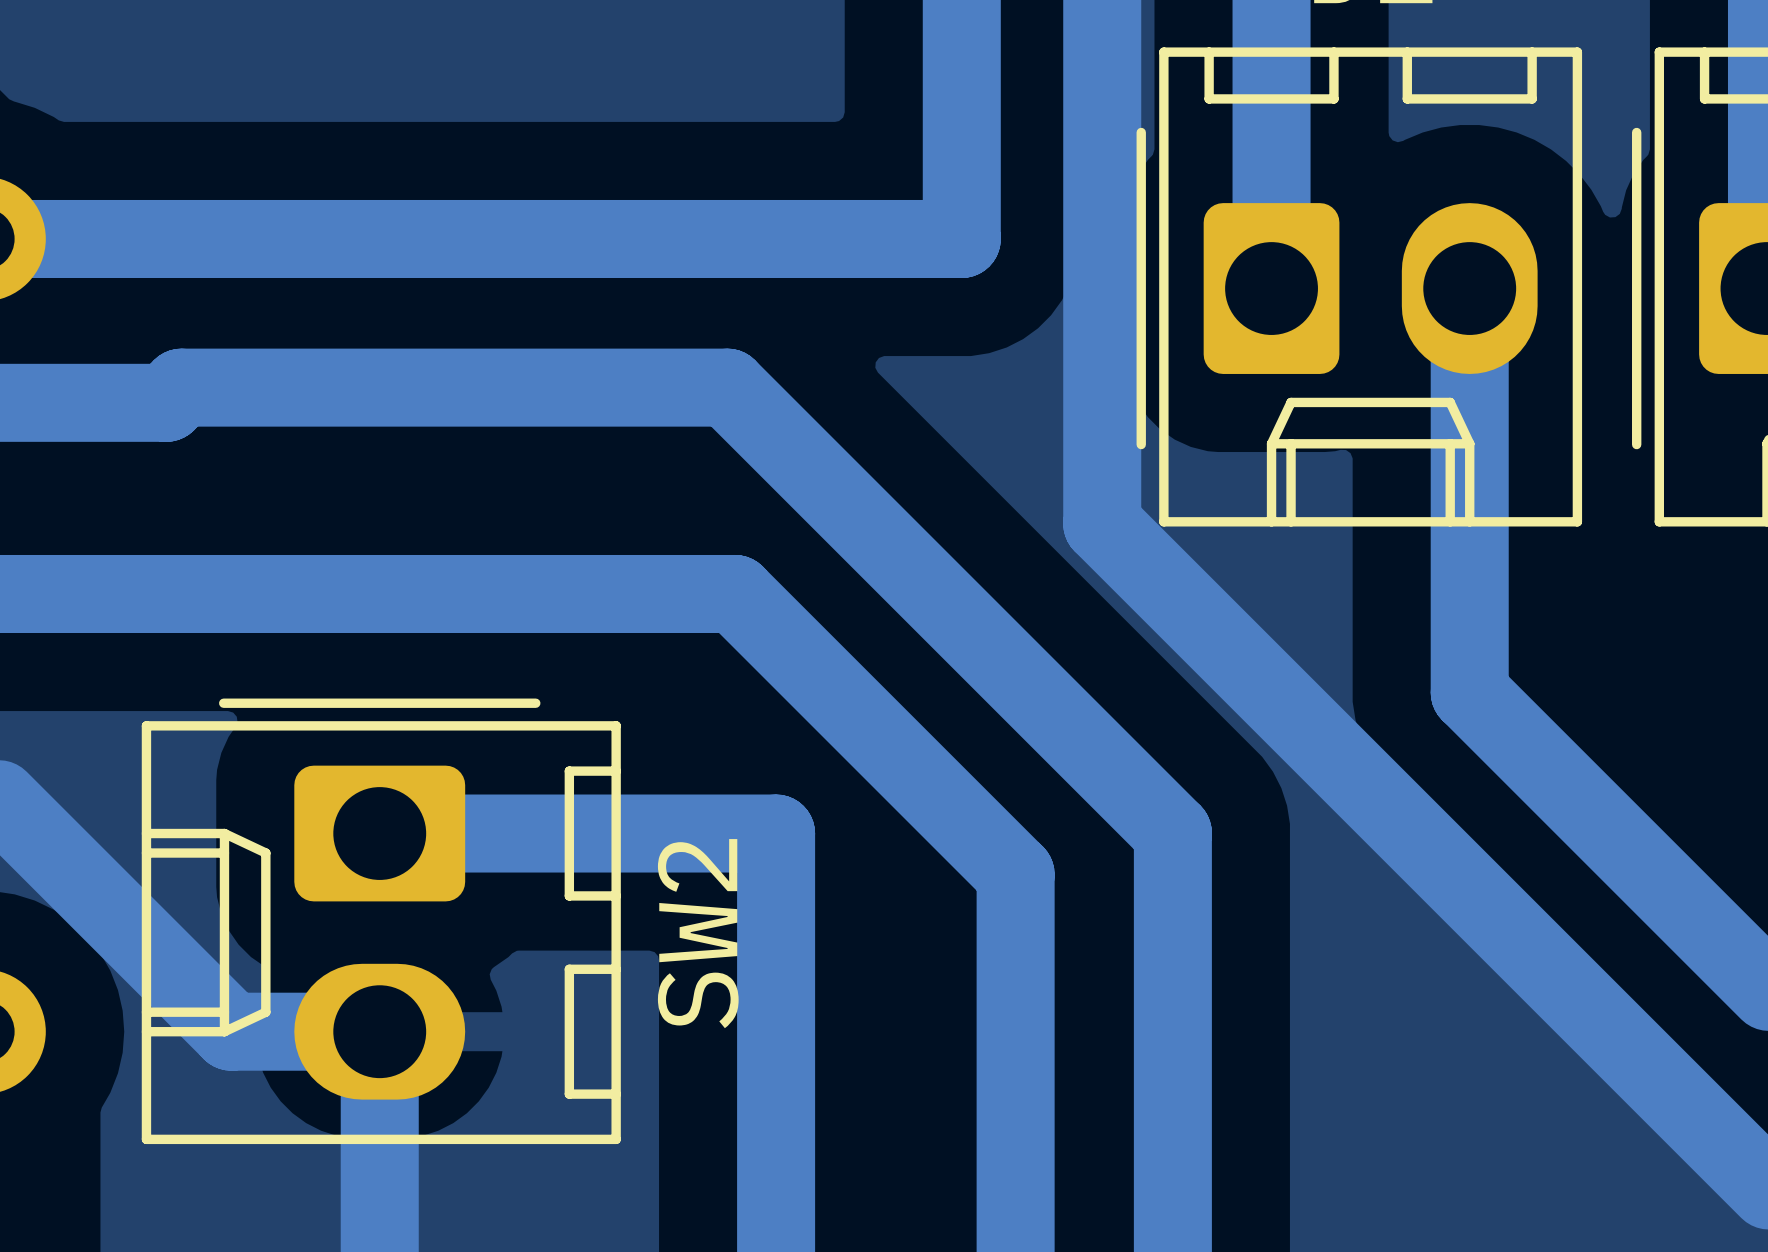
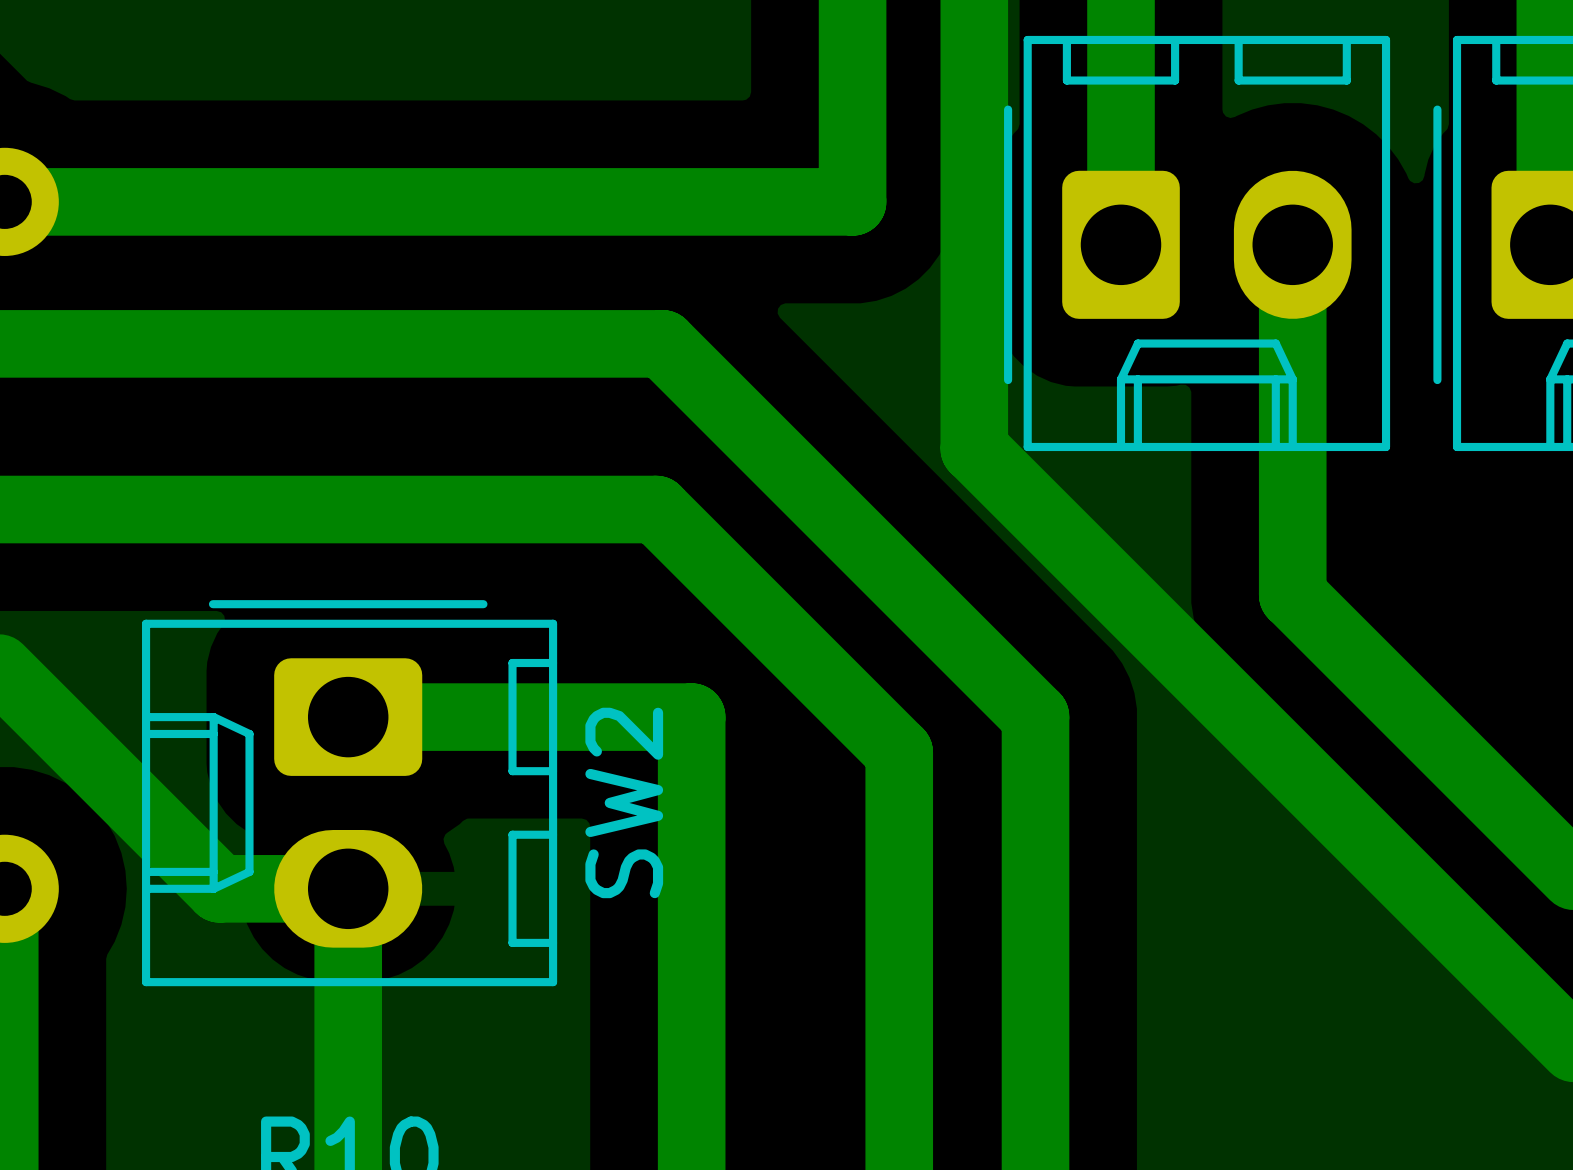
bottom track: (166, 402) (181, 387) (727, 387) (742, 402) -> (163, 343) (662, 343)

